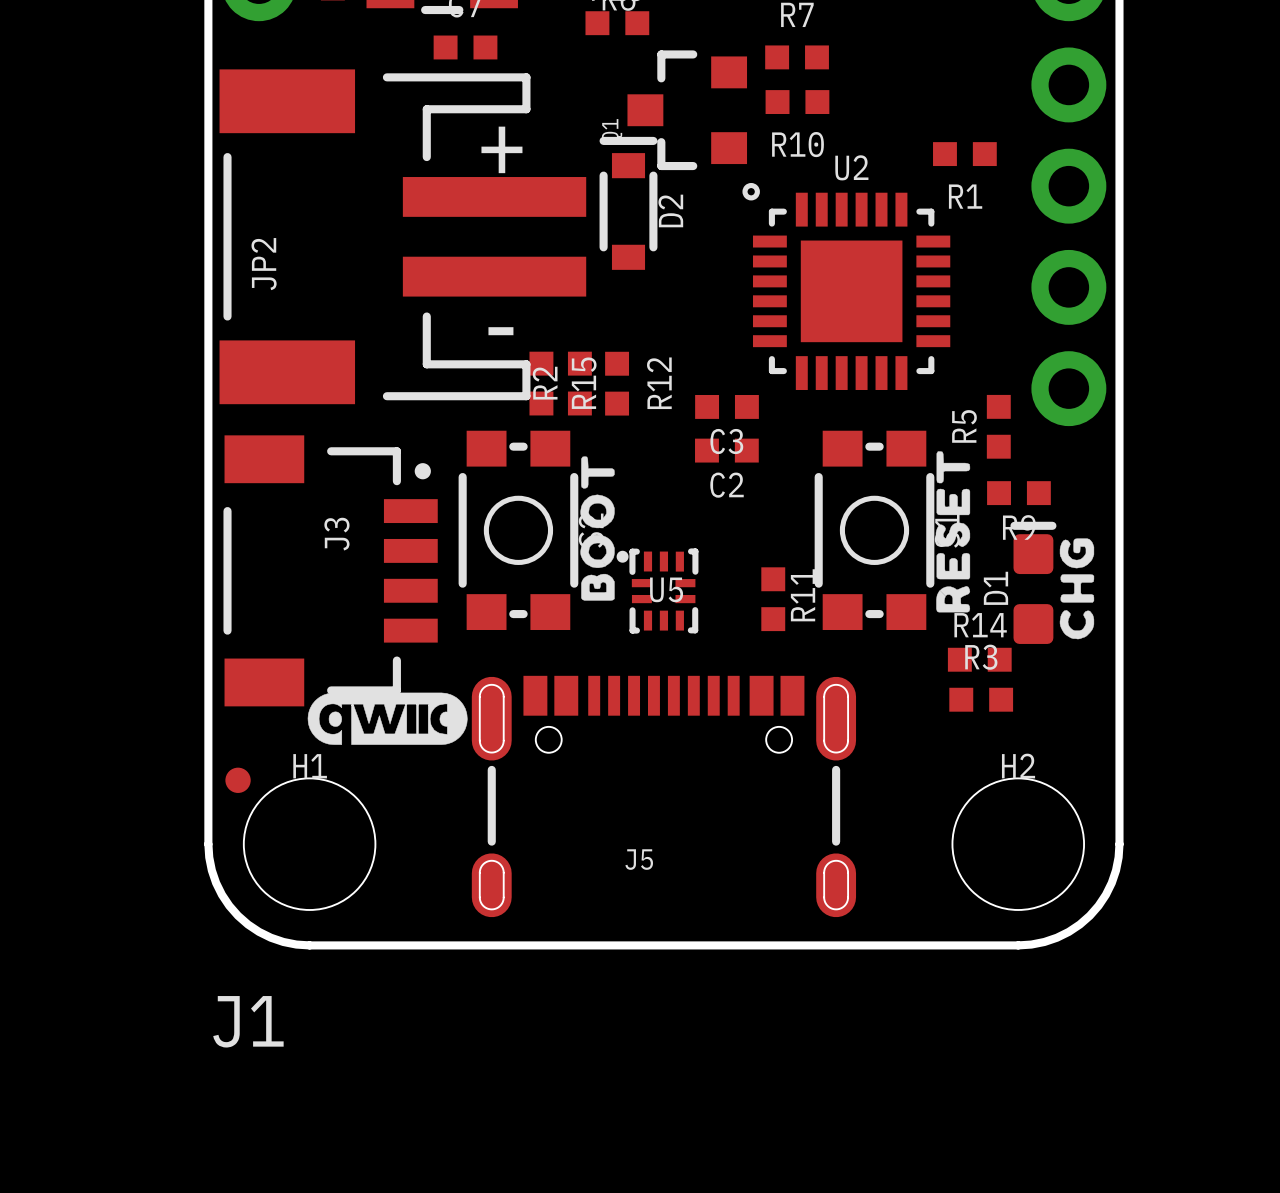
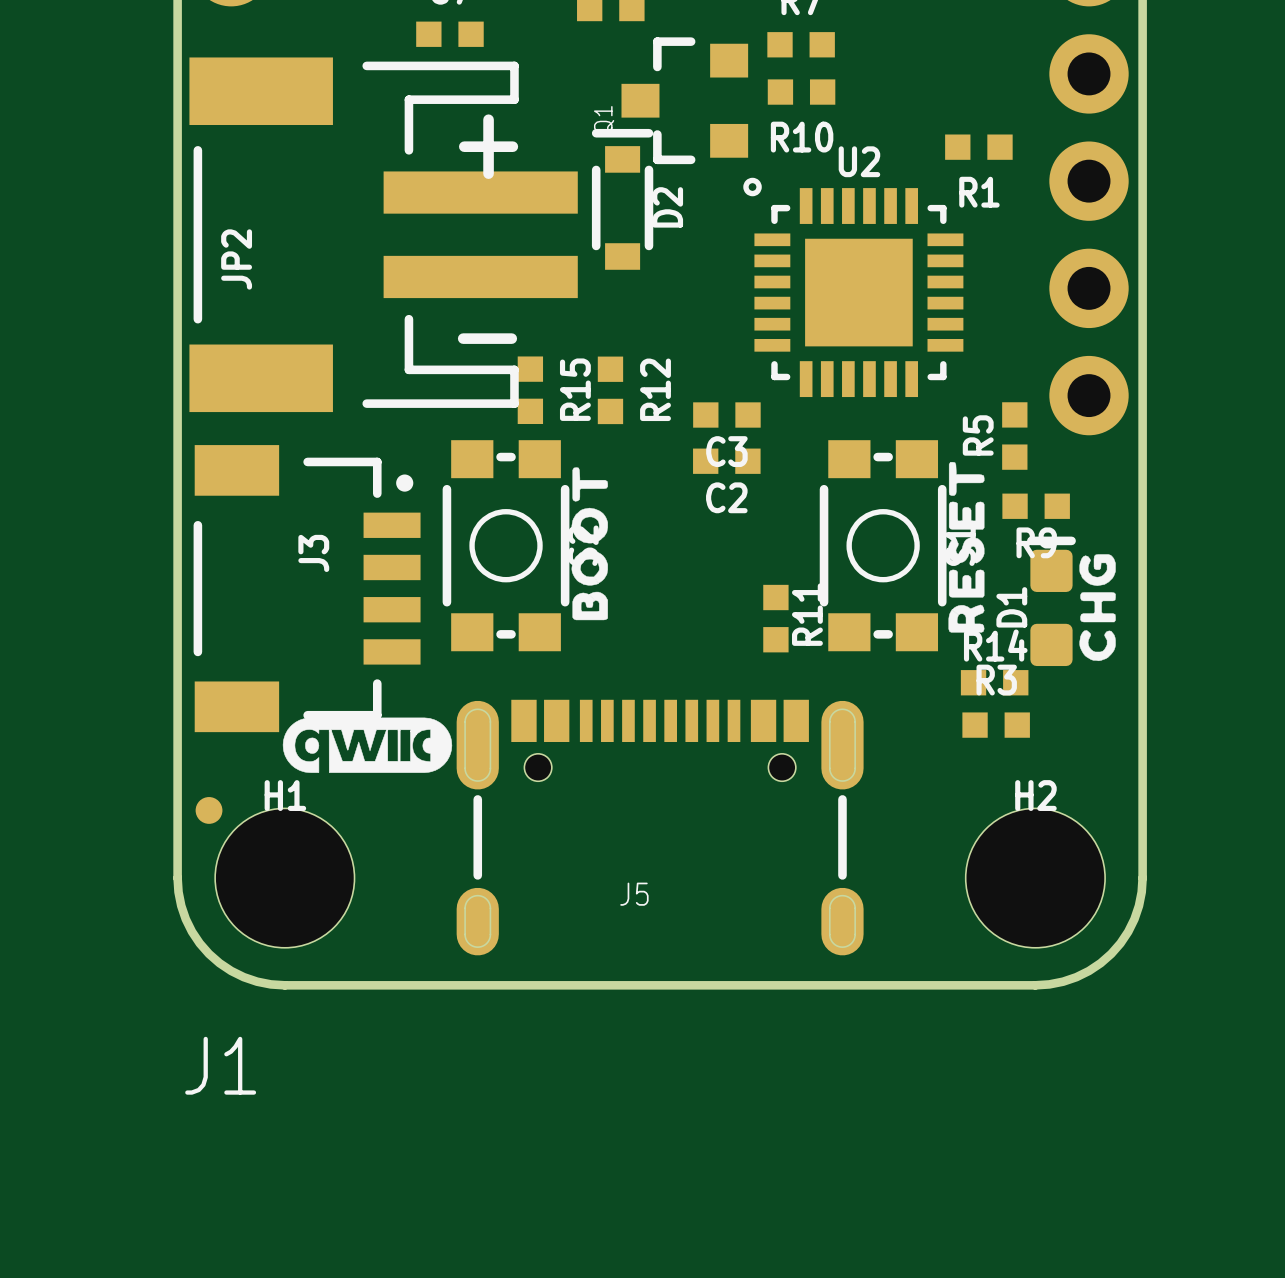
R2: (579, 383) -> none
U5: (657, 591) -> none

